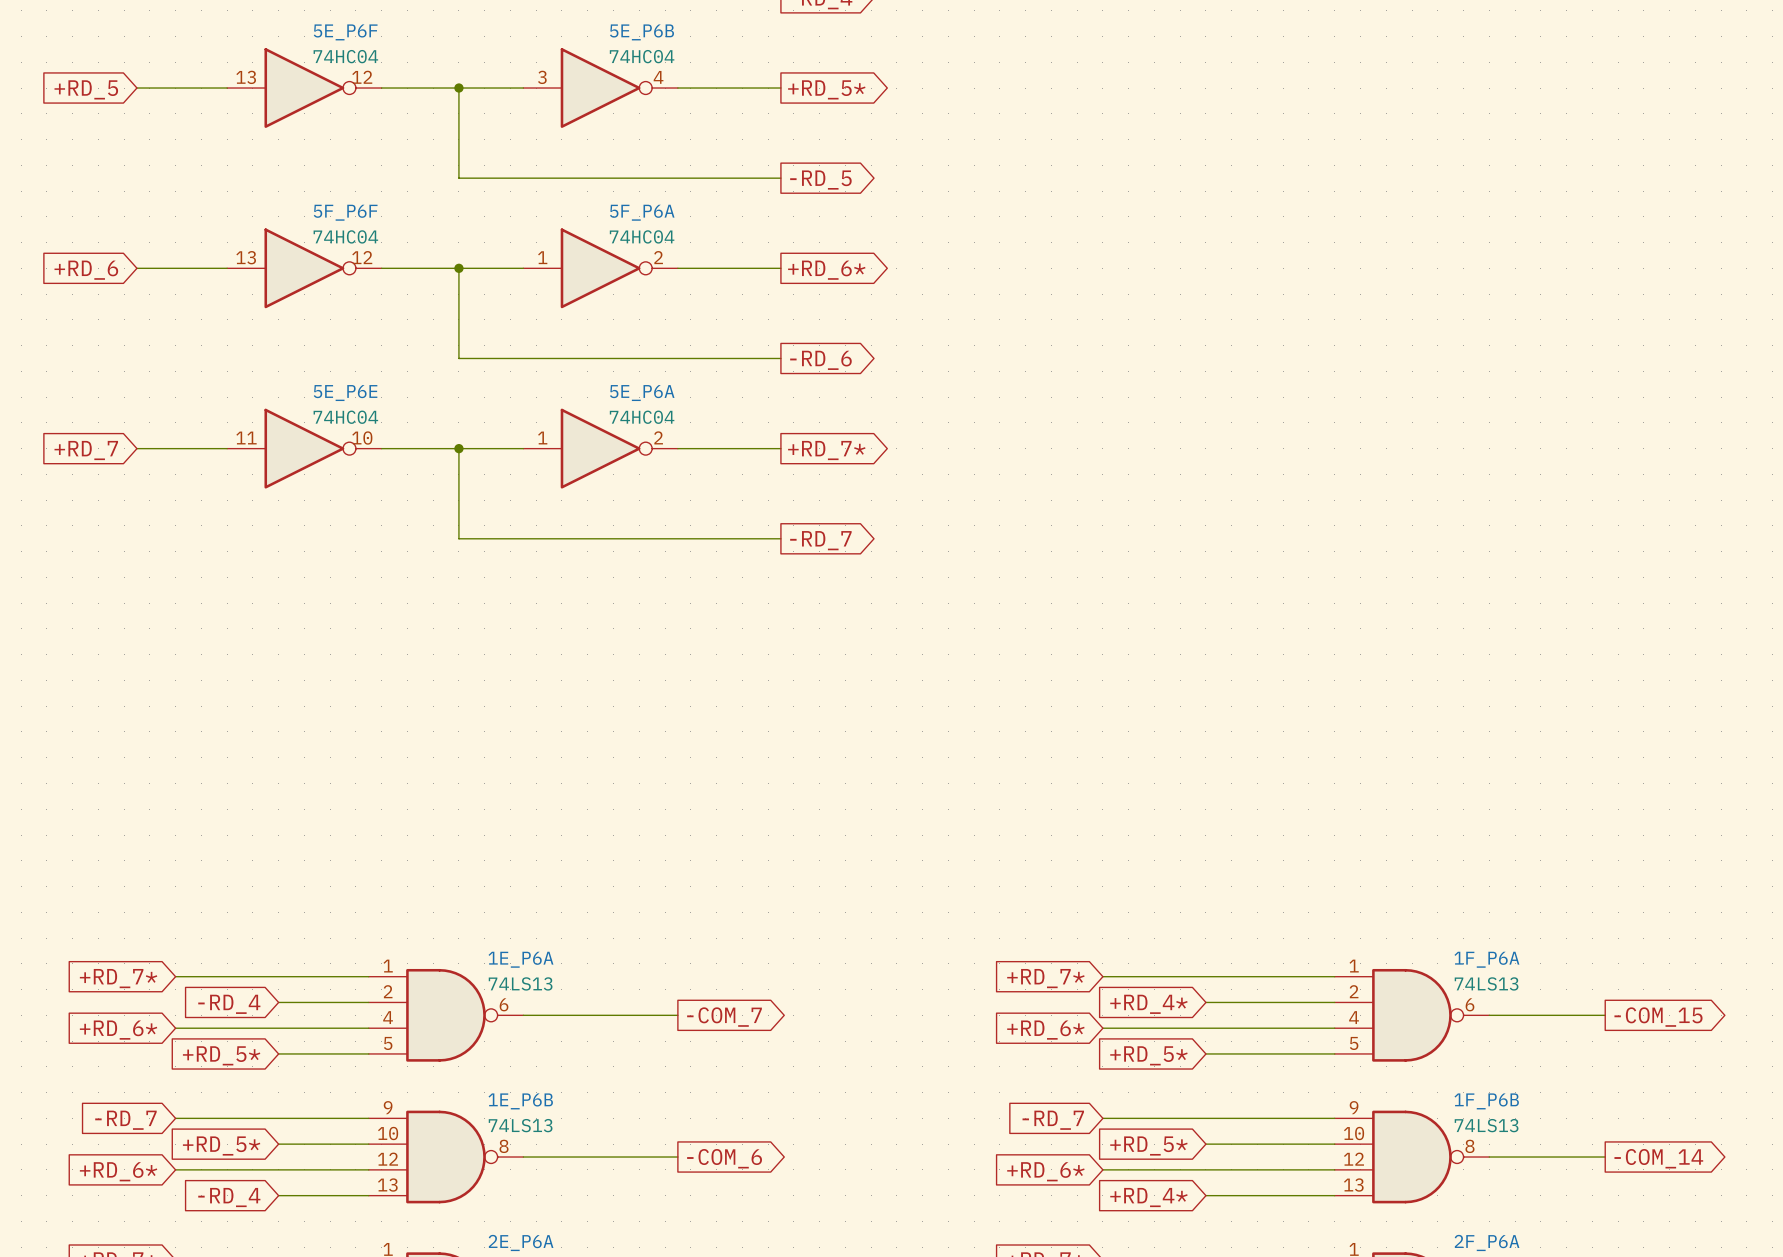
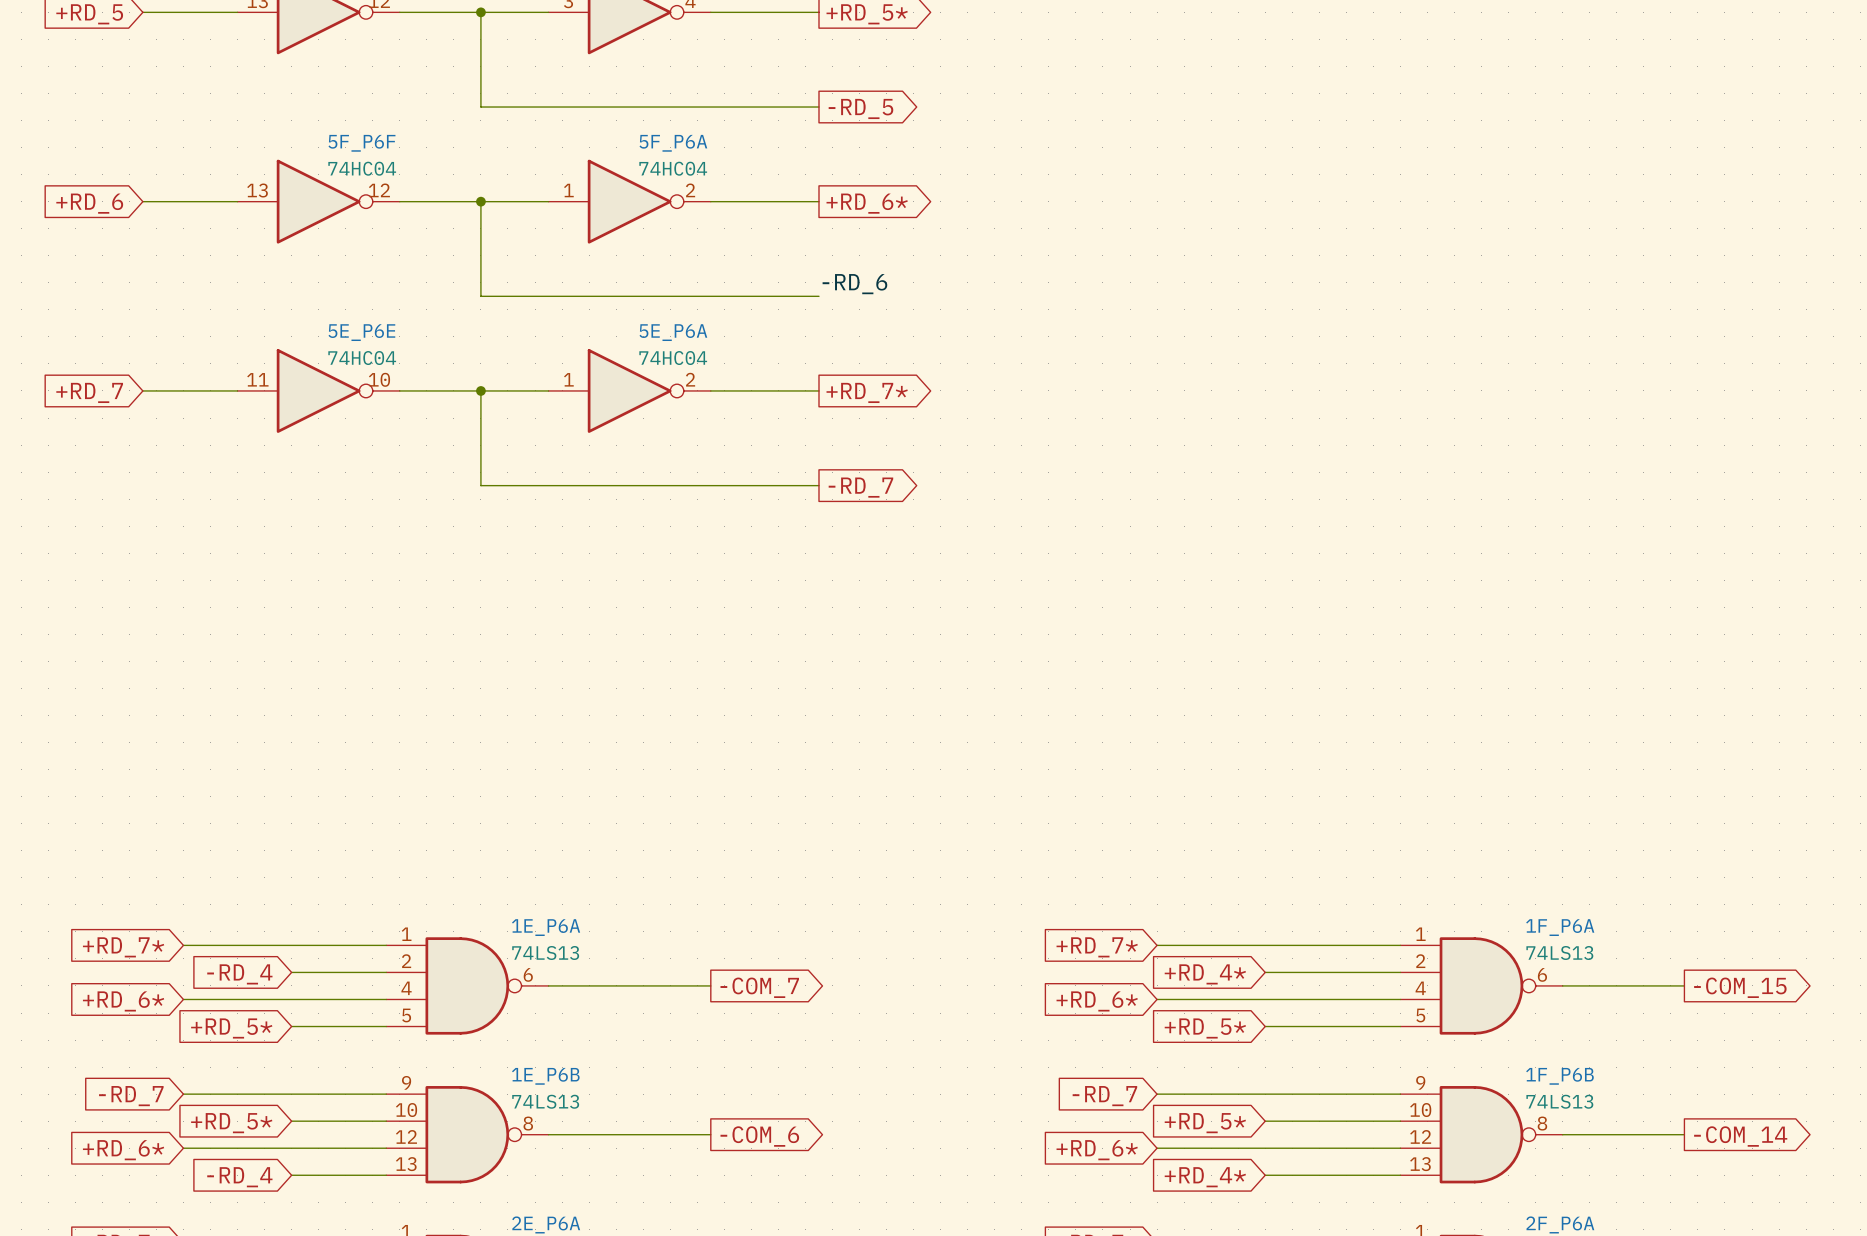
label: none -> -RD_6 (854, 284)
global label: -RD_6 (820, 360) -> none

